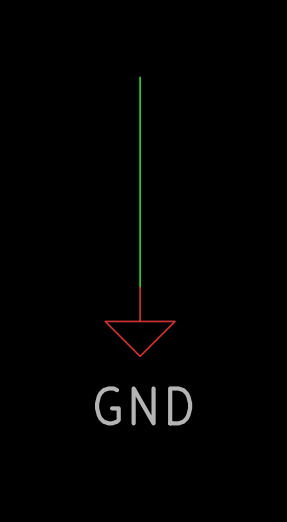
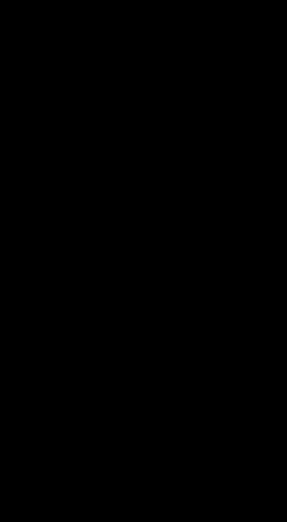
wire: (140, 77) (140, 286) -> none
power symbol: GND (140, 321) -> none

